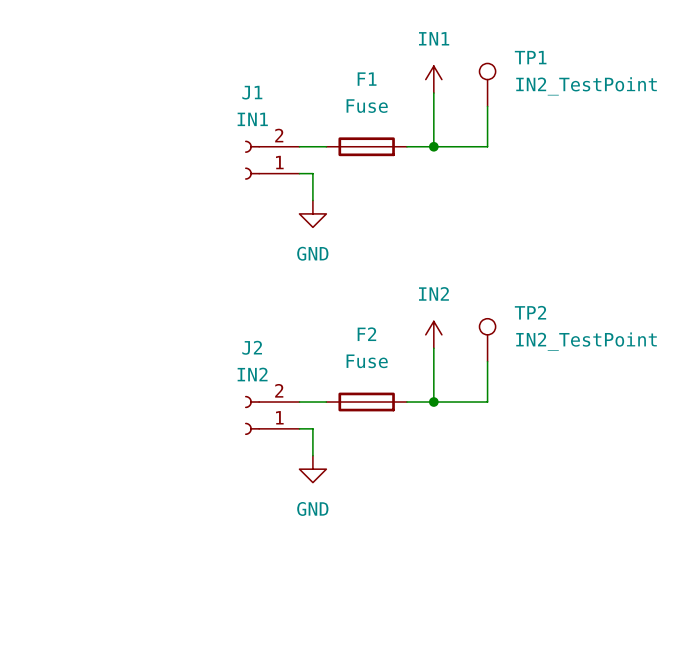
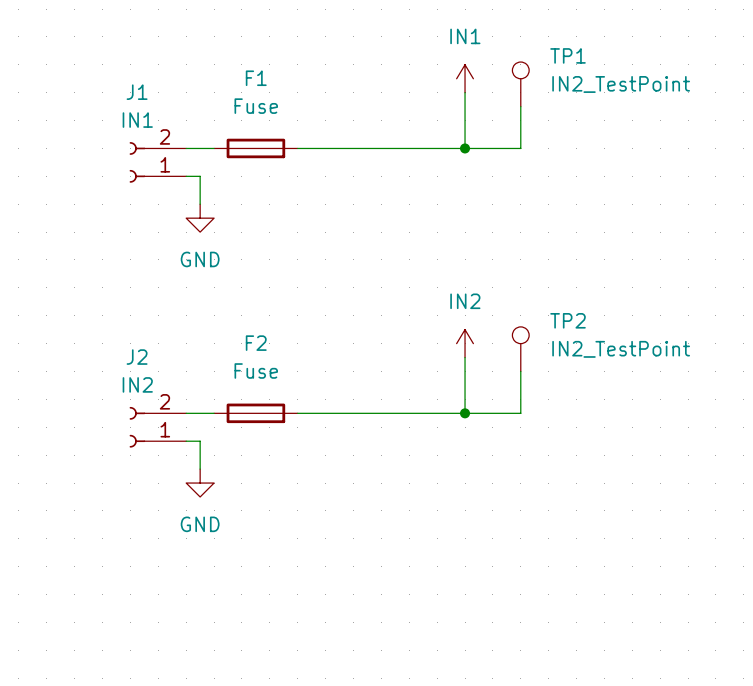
wire: none -> (186, 148) (214, 148)
F1 position: (366, 146) -> (255, 148)
J1 position: (272, 160) -> (157, 162)
wire: (299, 173) (312, 173) (312, 200) -> (186, 176) (200, 176) (200, 204)
power symbol position: GND (312, 213) -> GND (200, 218)
wire: none -> (186, 413) (214, 413)
F2 position: (366, 402) -> (255, 413)
J2 position: (272, 415) -> (157, 427)
wire: (299, 428) (312, 428) (312, 455) -> (186, 441) (200, 441) (200, 469)
power symbol position: GND (312, 469) -> GND (200, 483)

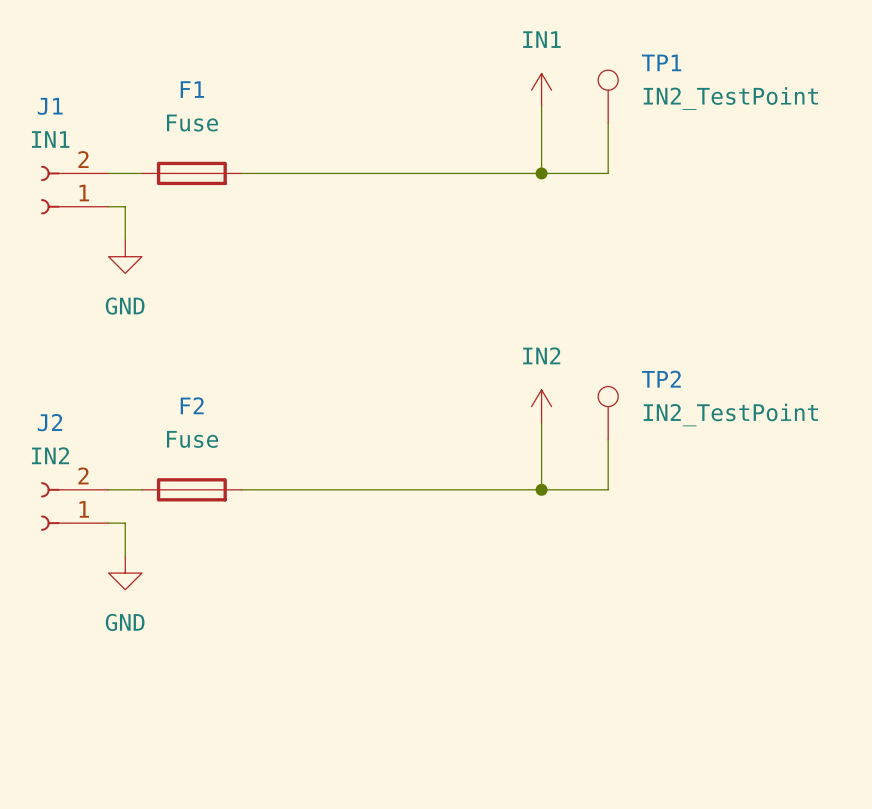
wire: none -> (108, 173) (141, 173)
F1 position: (255, 148) -> (191, 173)
J1 position: (157, 162) -> (74, 190)
wire: (186, 176) (200, 176) (200, 204) -> (108, 206) (125, 206) (125, 240)
power symbol position: GND (200, 218) -> GND (125, 256)
wire: none -> (108, 489) (141, 489)
F2 position: (255, 413) -> (191, 489)
J2 position: (157, 427) -> (74, 506)
wire: (186, 441) (200, 441) (200, 469) -> (108, 523) (125, 523) (125, 556)
power symbol position: GND (200, 483) -> GND (125, 573)

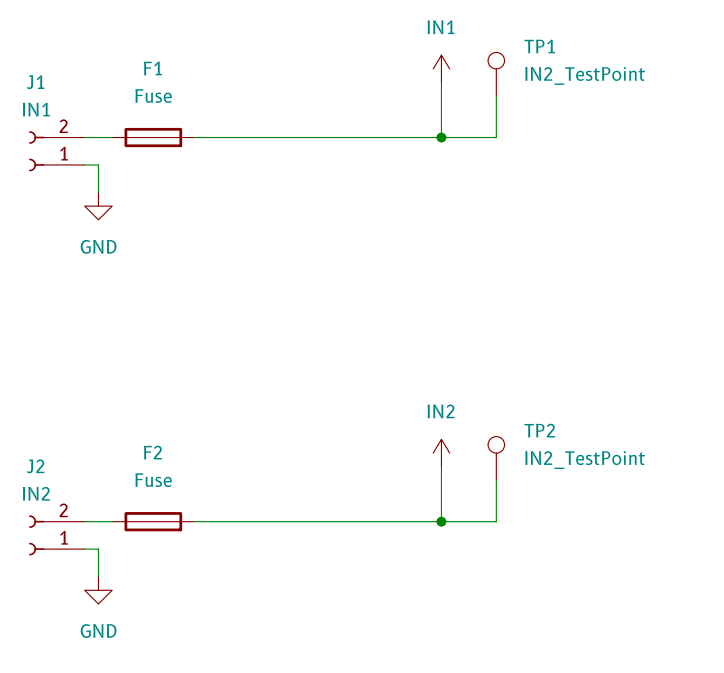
power symbol position: IN2 (541, 406) -> IN2 (441, 453)
TP2 position: (608, 413) -> (496, 458)
wire: (541, 423) (541, 489) -> (441, 466) (441, 521)
wire: (608, 439) (608, 489) (241, 489) -> (496, 480) (496, 521) (194, 521)
wire: (108, 489) (141, 489) -> (84, 521) (112, 521)
F2 position: (191, 489) -> (153, 521)
junction: (541, 489) -> none
J2 position: (74, 506) -> (56, 535)
wire: (108, 523) (125, 523) (125, 556) -> (84, 549) (98, 549) (98, 576)
power symbol position: GND (125, 573) -> GND (98, 590)
junction: none -> (441, 521)

